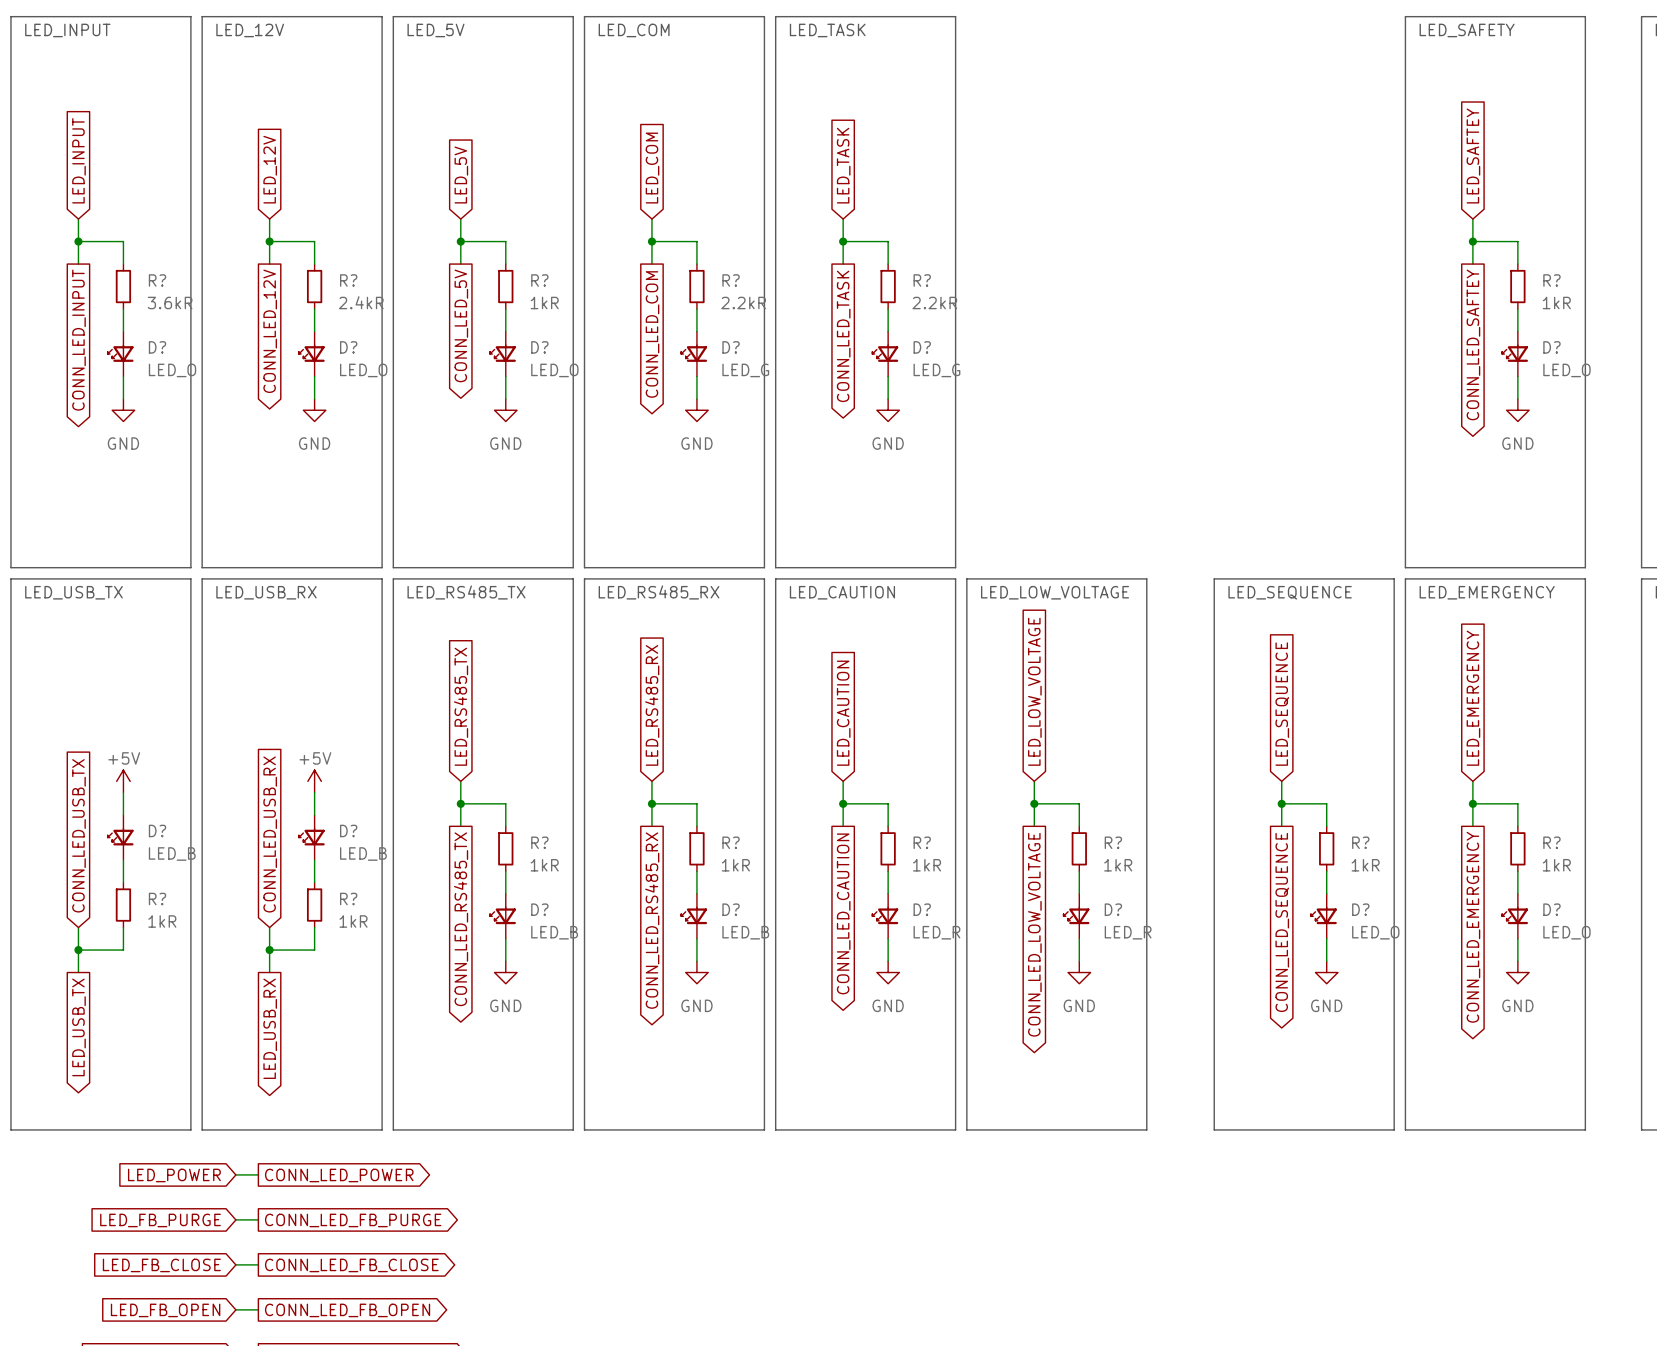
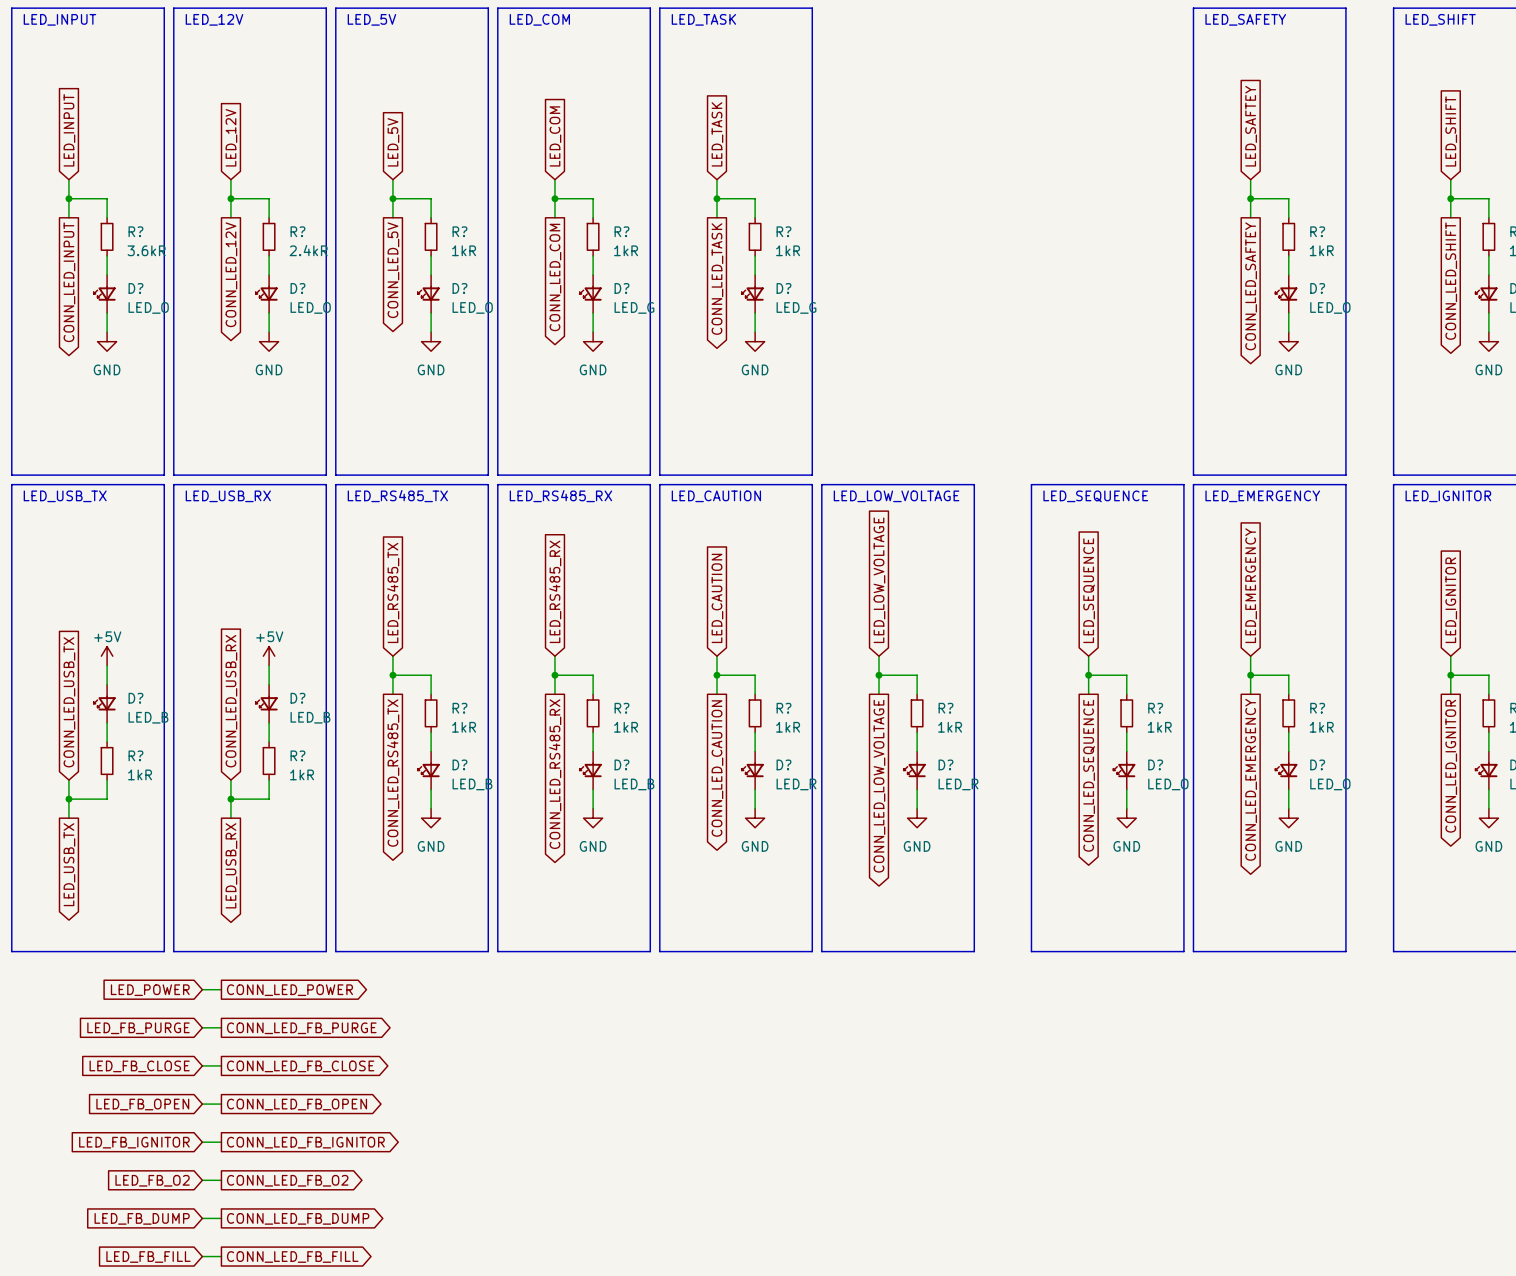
R? value: 2.2kR (743, 302) -> 1kR (626, 250)
R? value: 2.2kR (934, 302) -> 1kR (788, 250)

